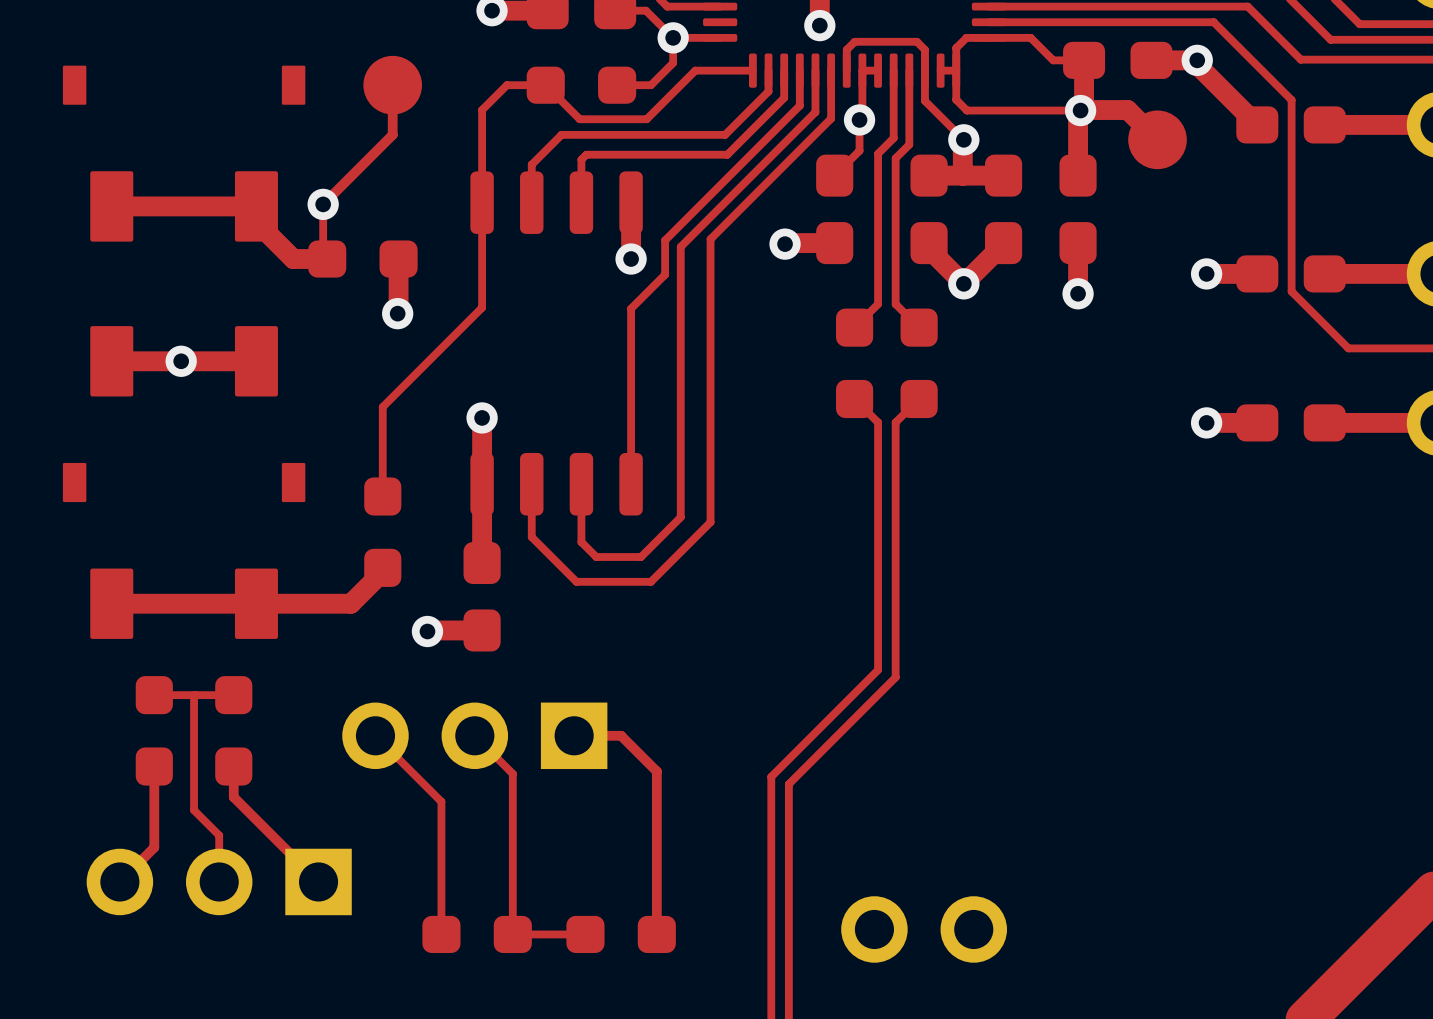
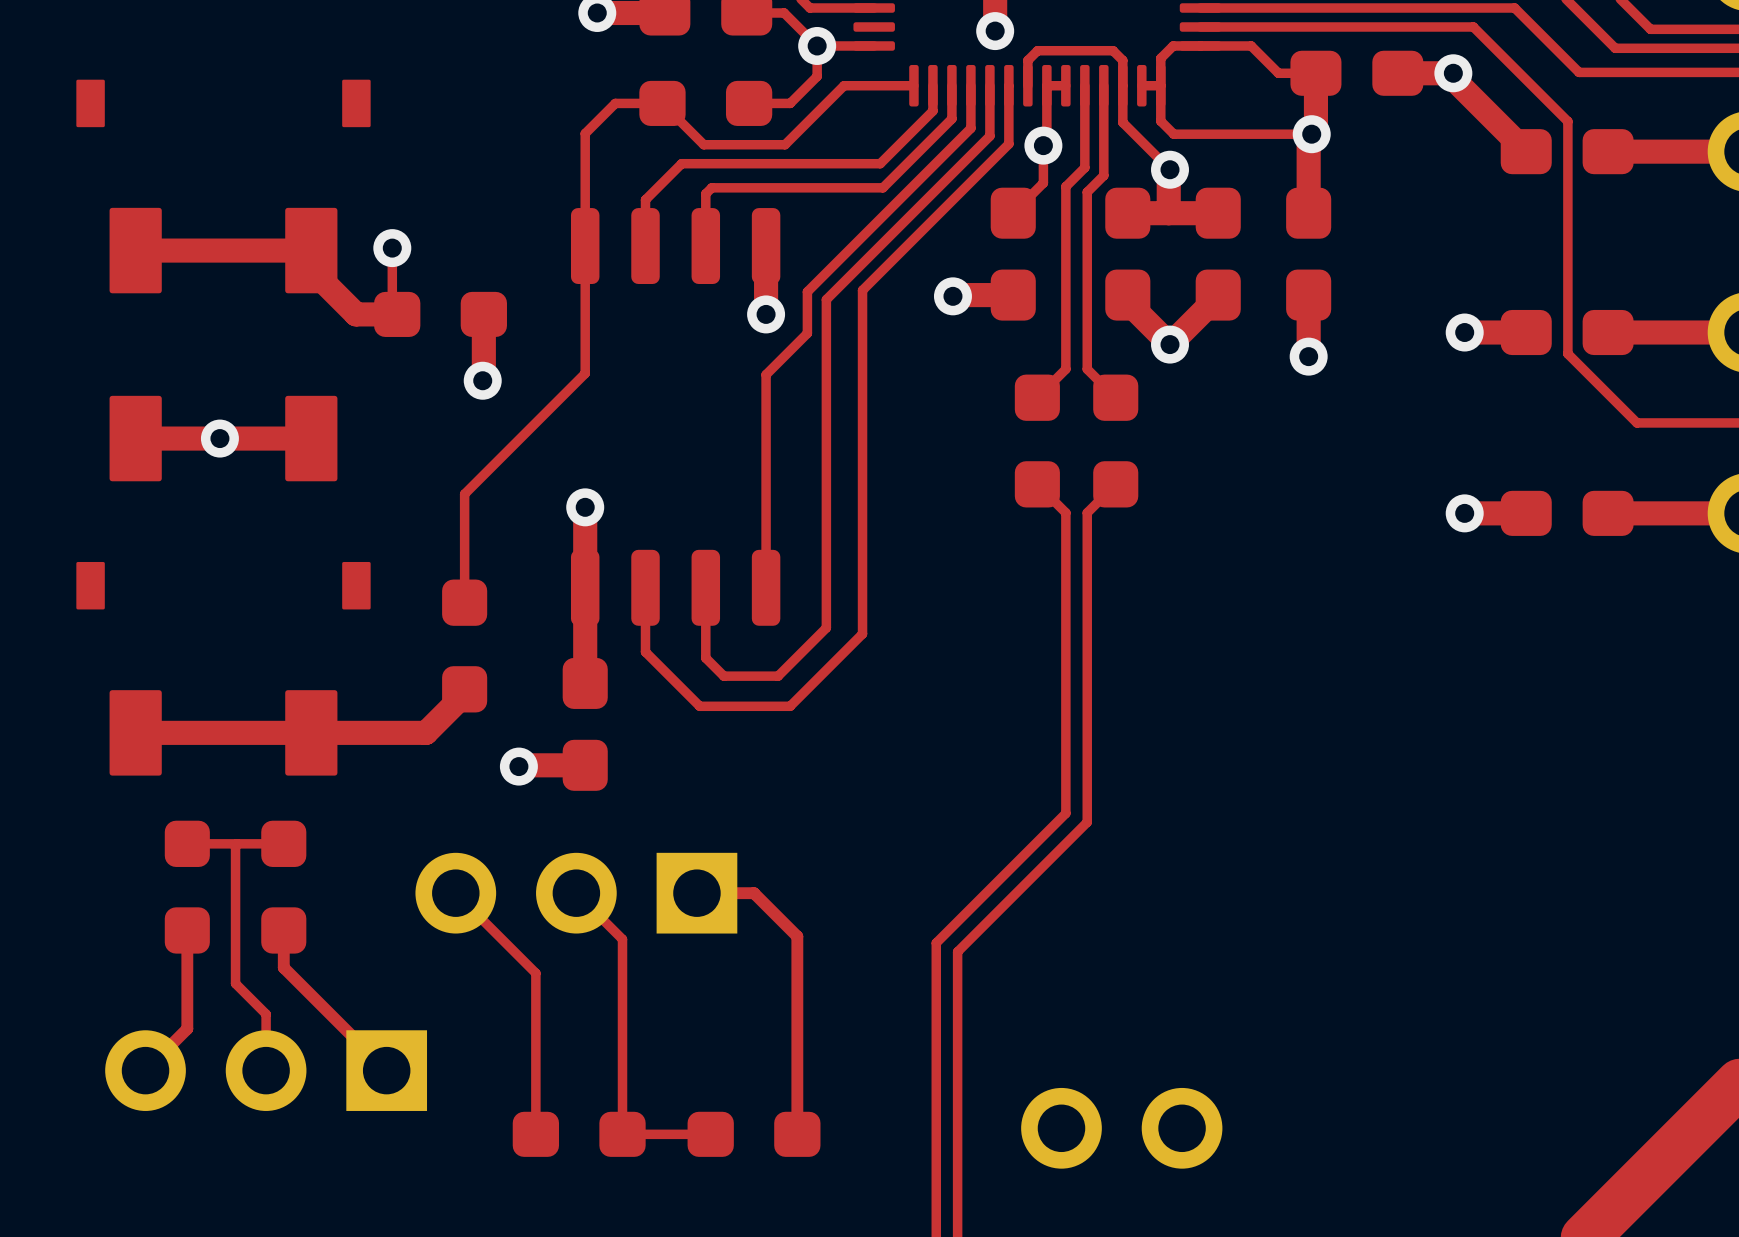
top track: (392, 85) (392, 134) (323, 204) -> none
part: (392, 85) -> none
top track: (1081, 110) (1127, 110) (1157, 139) -> none
part: (1157, 139) -> none

